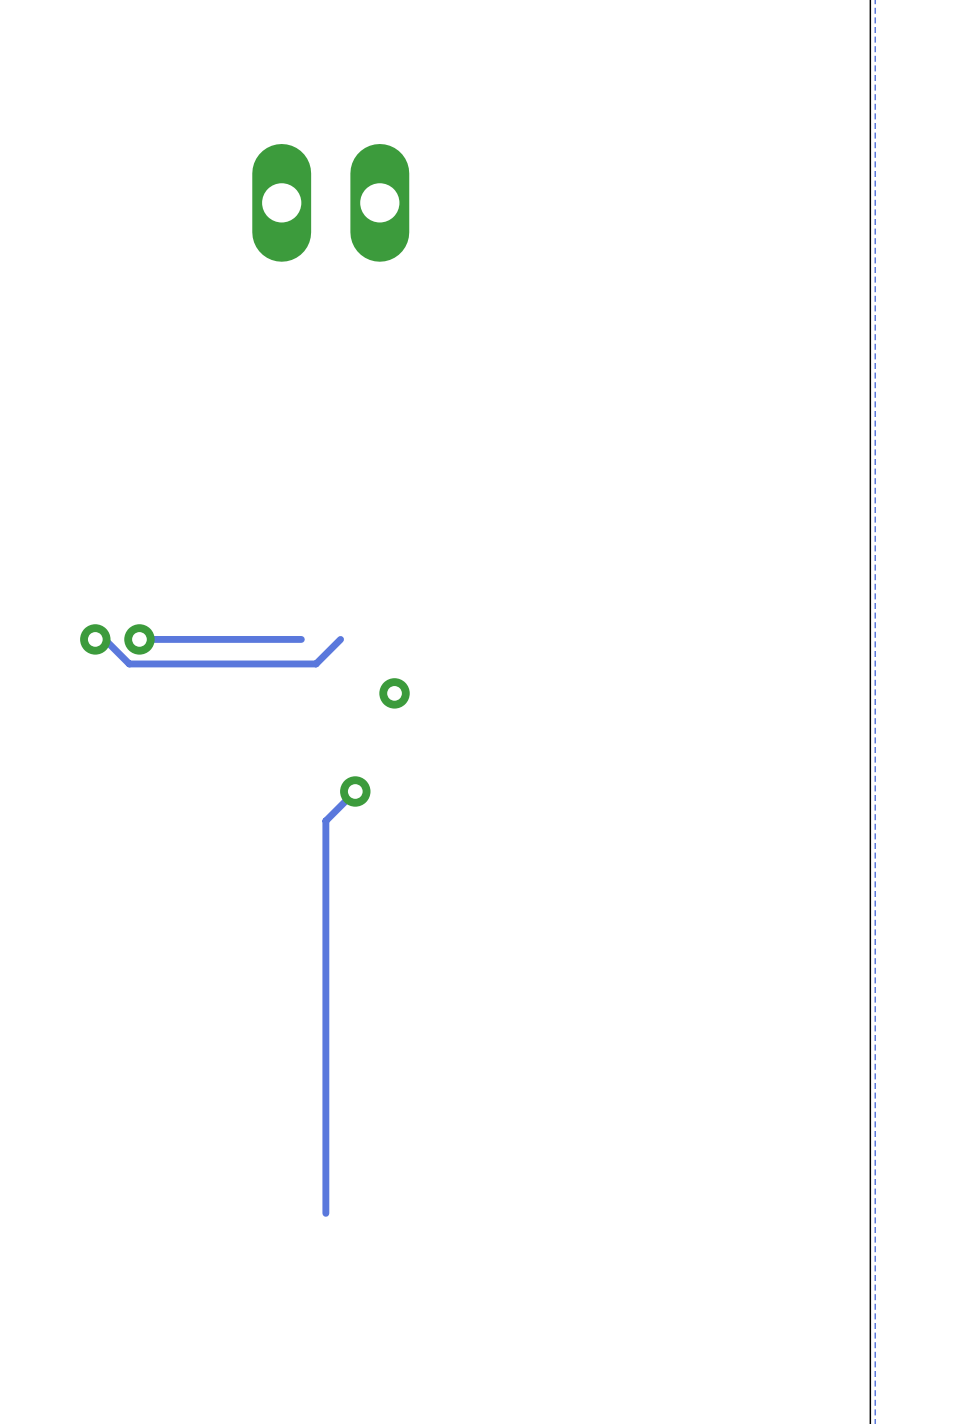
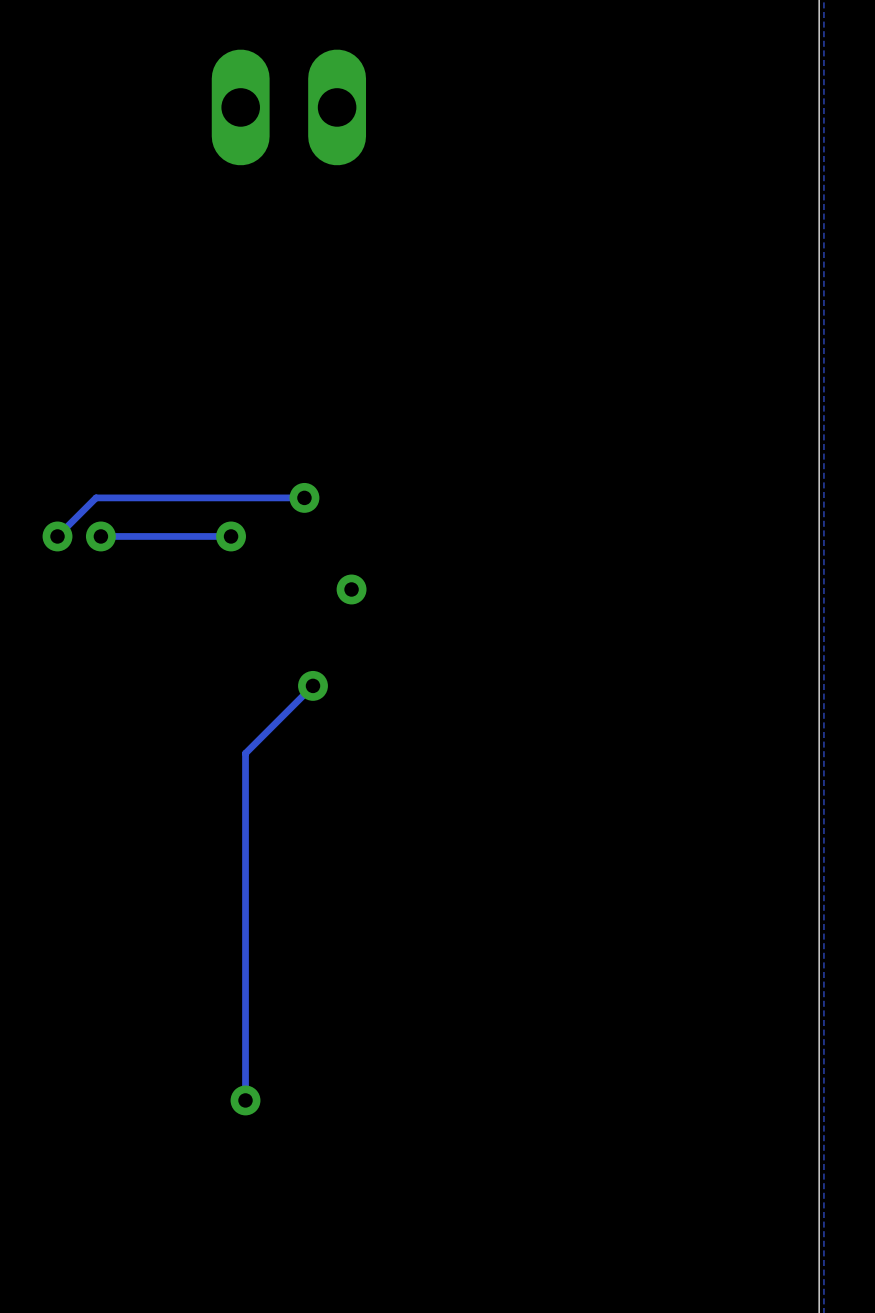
via: none -> (304, 497)
via: none -> (231, 536)
track: (301, 639) (271, 639) -> none
track: (340, 639) (316, 663) (129, 663) (104, 639) (95, 639) -> (304, 497) (96, 497) (57, 536)
track: (325, 820) (325, 1213) -> (284, 714) (245, 753) (245, 1100)
via: none -> (245, 1100)

